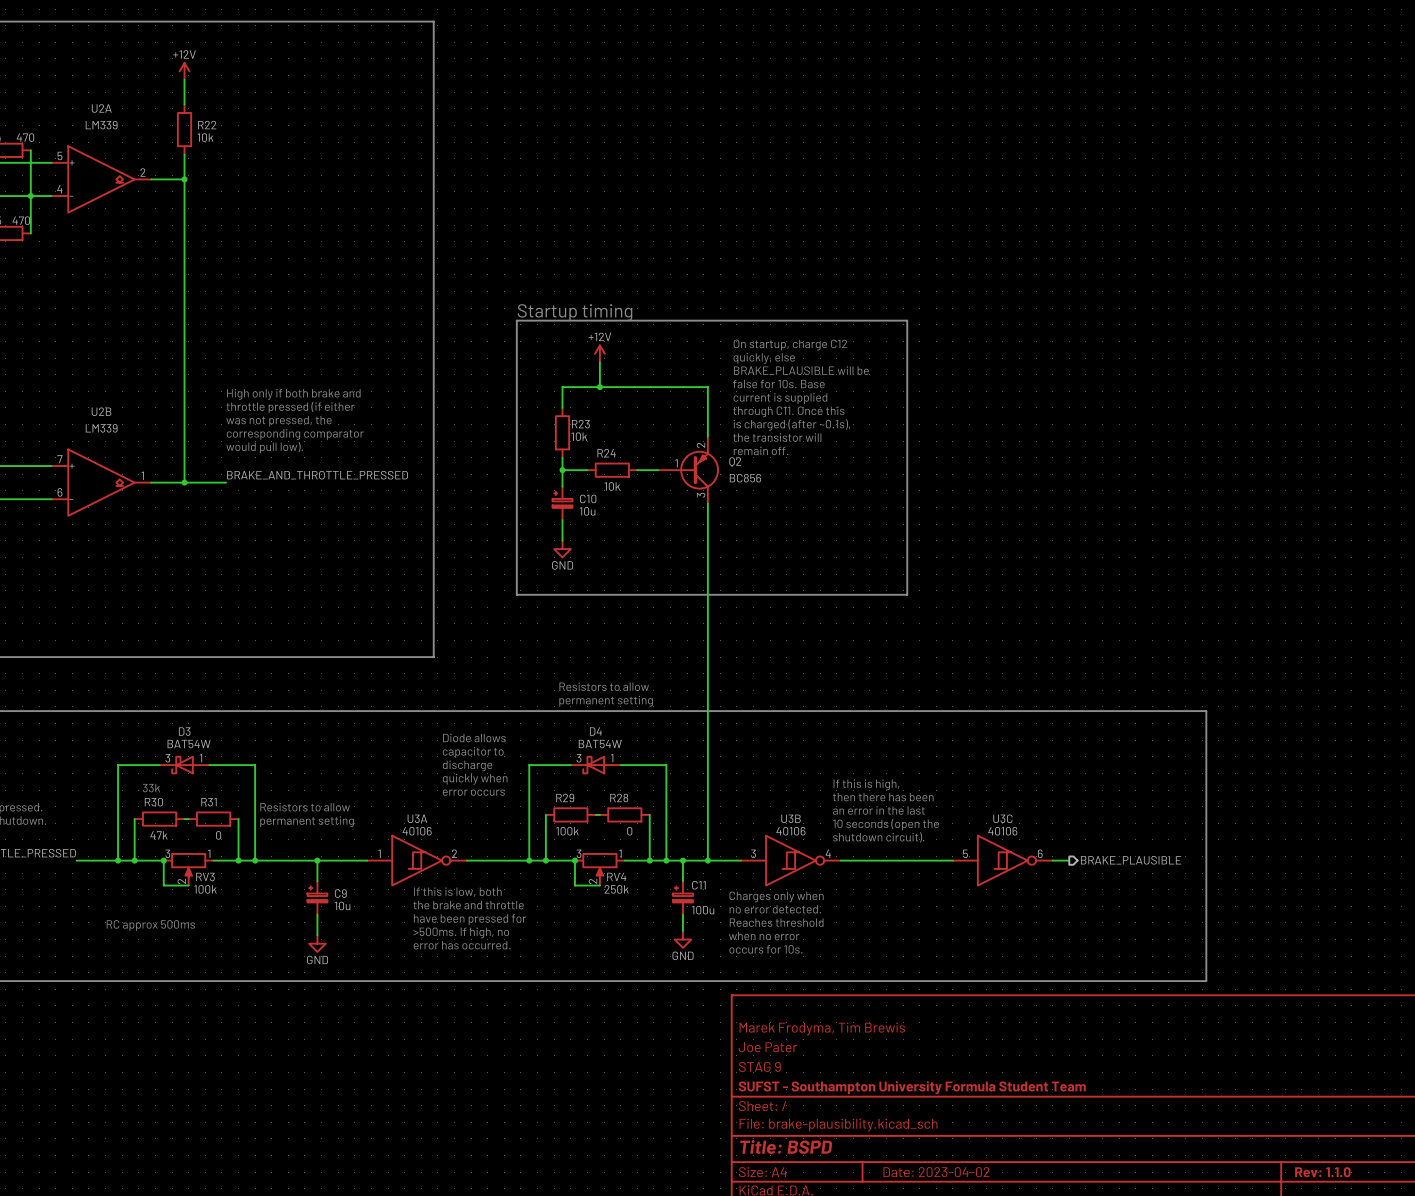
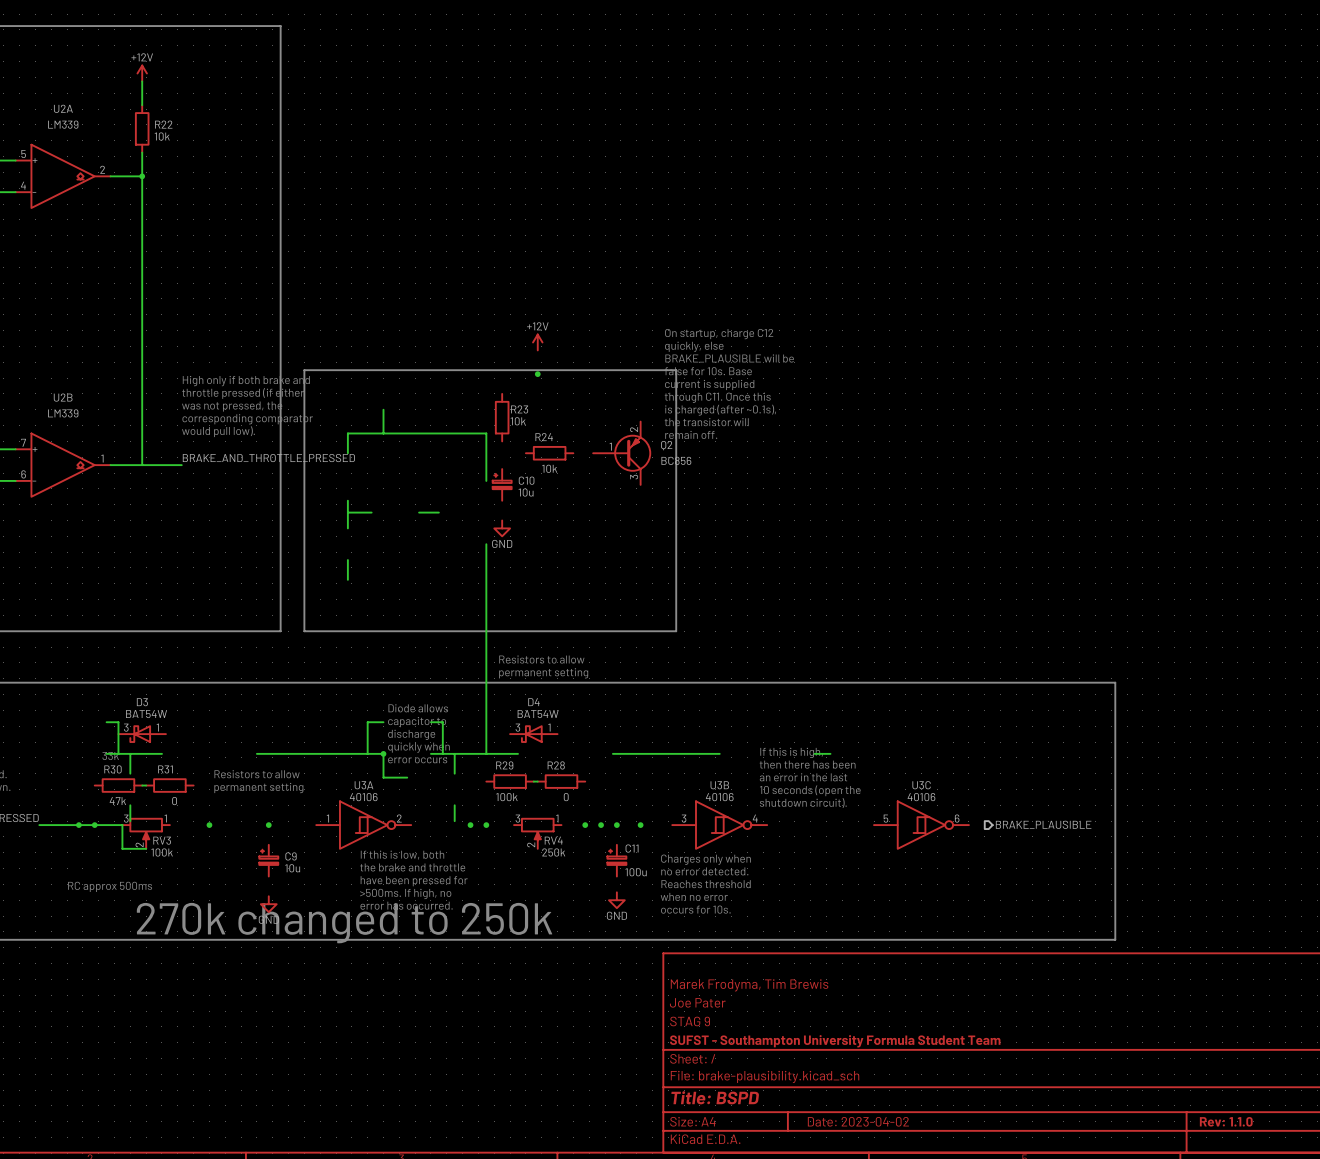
line: (329, 21) (433, 21) (433, 657) -> (280, 26) (280, 631)
text: Startup timing (575, 312) -> none
line: (516, 320) (907, 320) (907, 594) (516, 594) (516, 320) -> none
wire: (599, 362) (599, 387) -> none
wire: (562, 407) (562, 387) (707, 387) (707, 436) -> none
wire: none -> (383, 409) (383, 433)
wire: (562, 457) (562, 486) -> none
wire: none -> (347, 453) (347, 433) (486, 433) (486, 480)
wire: (562, 470) (587, 470) -> none
junction: (562, 470) -> none
wire: (637, 470) (658, 470) -> none
junction: (184, 482) -> none
wire: (707, 503) (707, 860) -> none
wire: none -> (347, 500) (347, 528)
wire: (562, 520) (562, 540) -> none
wire: none -> (347, 512) (371, 512)
wire: none -> (419, 512) (438, 512)
wire: none -> (486, 544) (486, 753)
wire: none -> (347, 560) (347, 579)
line: (329, 657) (354, 657) -> (379, 631) (676, 631) (676, 370) (304, 370) (304, 631)
wire: none -> (106, 722) (118, 722) (118, 753)
wire: none -> (383, 722) (367, 722) (367, 753)
wire: none -> (430, 722) (442, 722) (442, 753)
wire: (159, 765) (118, 765) (118, 860) -> none
wire: (209, 765) (255, 765) (255, 860) -> none
wire: (570, 765) (529, 765) (529, 860) -> none
wire: (620, 765) (666, 765) (666, 860) -> none
wire: none -> (106, 753) (161, 753)
wire: none -> (256, 753) (383, 753) (383, 777) (407, 777)
junction: none -> (383, 753)
wire: none -> (430, 753) (517, 753)
wire: none -> (454, 753) (454, 773)
wire: none -> (612, 753) (719, 753)
wire: none -> (814, 753) (830, 753)
wire: (545, 814) (545, 860) -> none
wire: (649, 814) (649, 860) -> none
wire: (134, 819) (134, 860) -> none
wire: (238, 819) (238, 860) -> none
wire: none -> (130, 805) (130, 821)
wire: none -> (454, 805) (454, 821)
junction: (163, 860) -> none
wire: (213, 860) (367, 860) -> none
junction: (238, 860) -> none
wire: (317, 860) (317, 881) -> (130, 753) (130, 773)
wire: (466, 860) (574, 860) (574, 885) (599, 885) -> none
junction: (574, 860) -> none
wire: (624, 860) (741, 860) -> none
wire: (682, 860) (682, 881) -> none
wire: (840, 860) (952, 860) -> none
wire: (1052, 860) (1069, 860) -> none
wire: (317, 914) (317, 935) -> none
wire: (682, 914) (682, 931) -> none
text: none -> 270k changed to 250k (344, 923)

